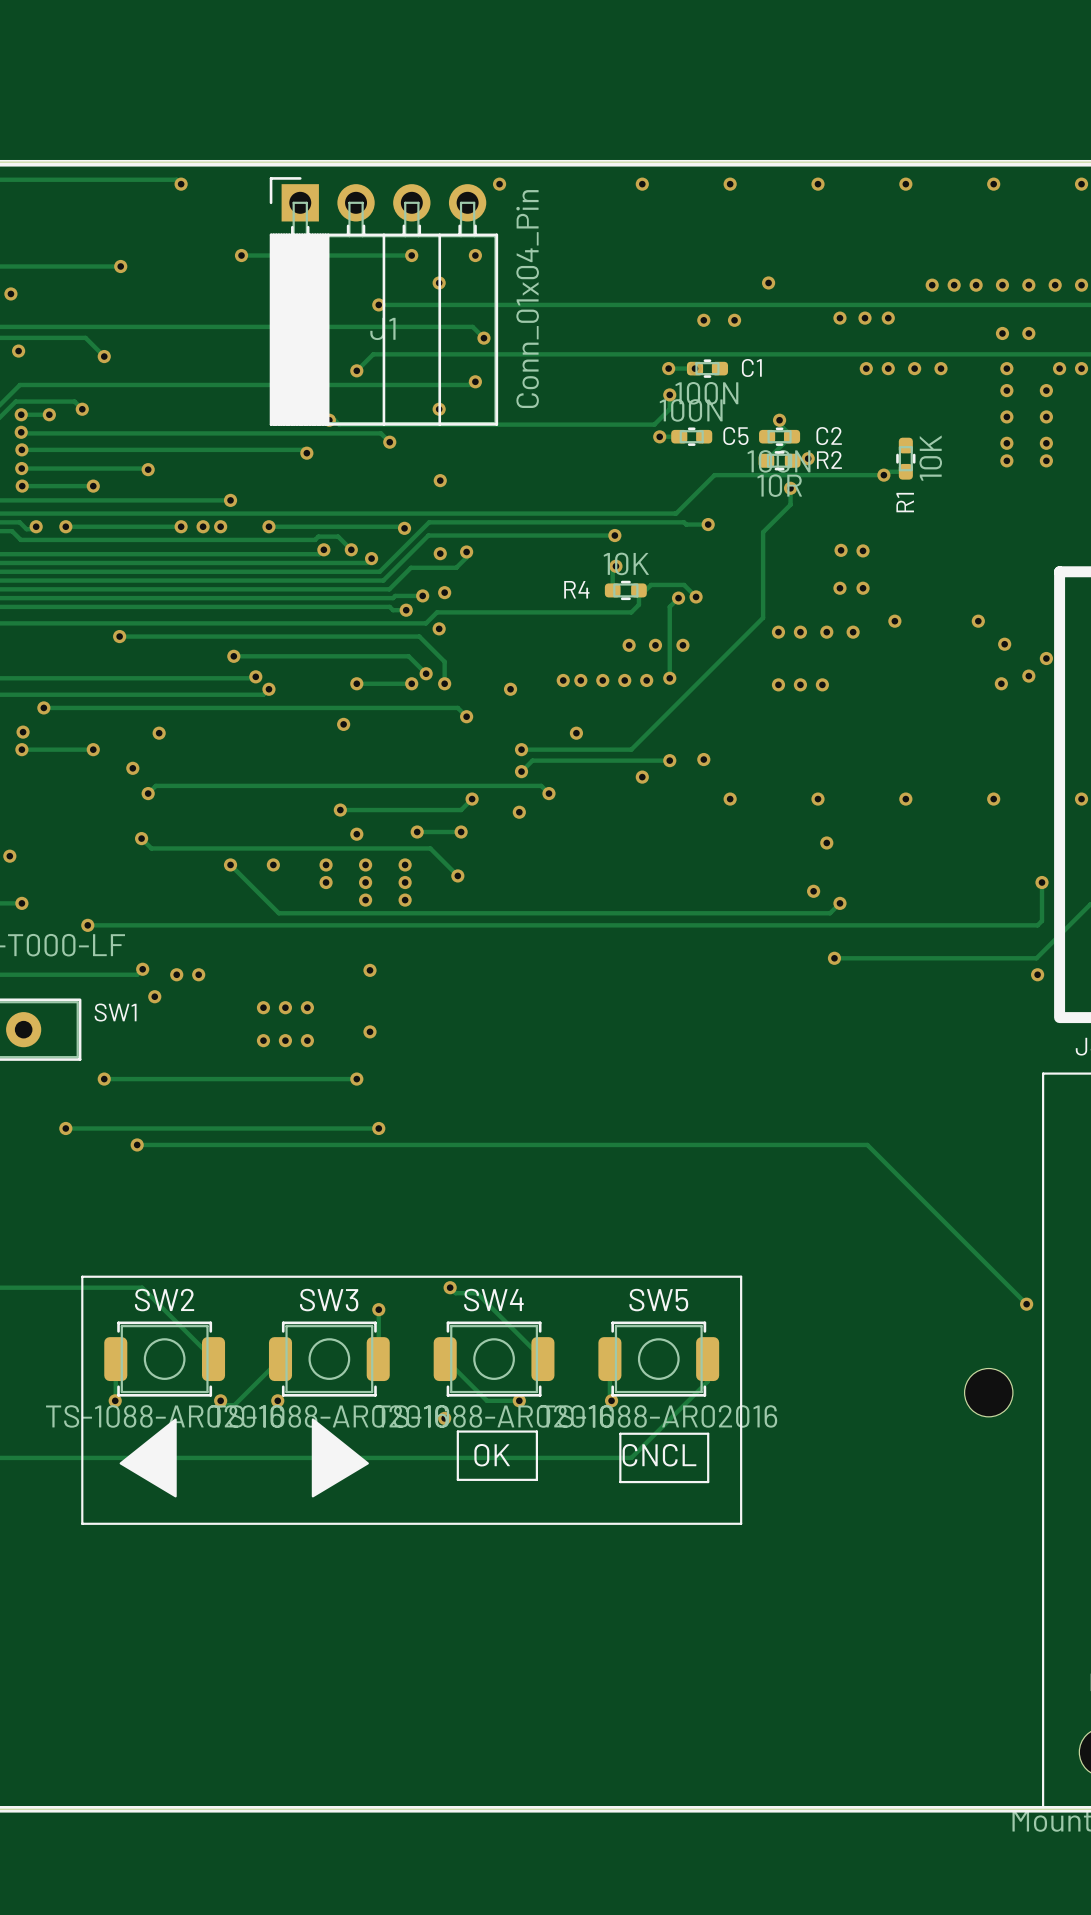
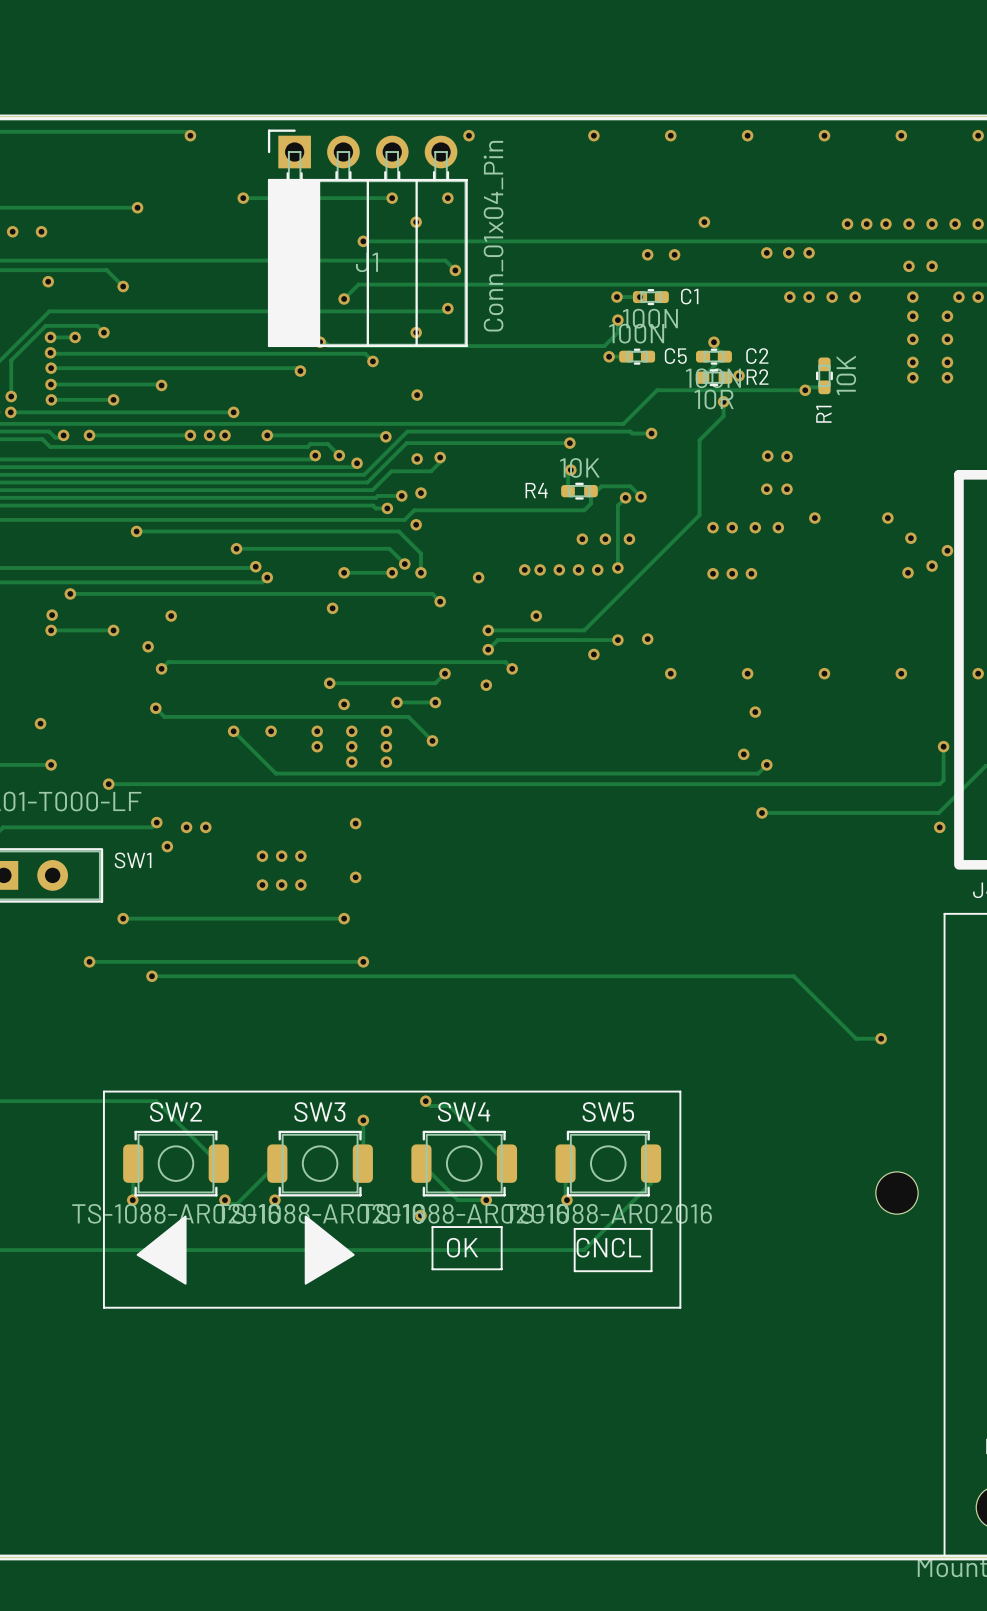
track: (867, 1144) (1026, 1304) -> (790, 976) (793, 976) (856, 1038) (881, 1038)
via position: (1026, 1304) -> (881, 1038)

